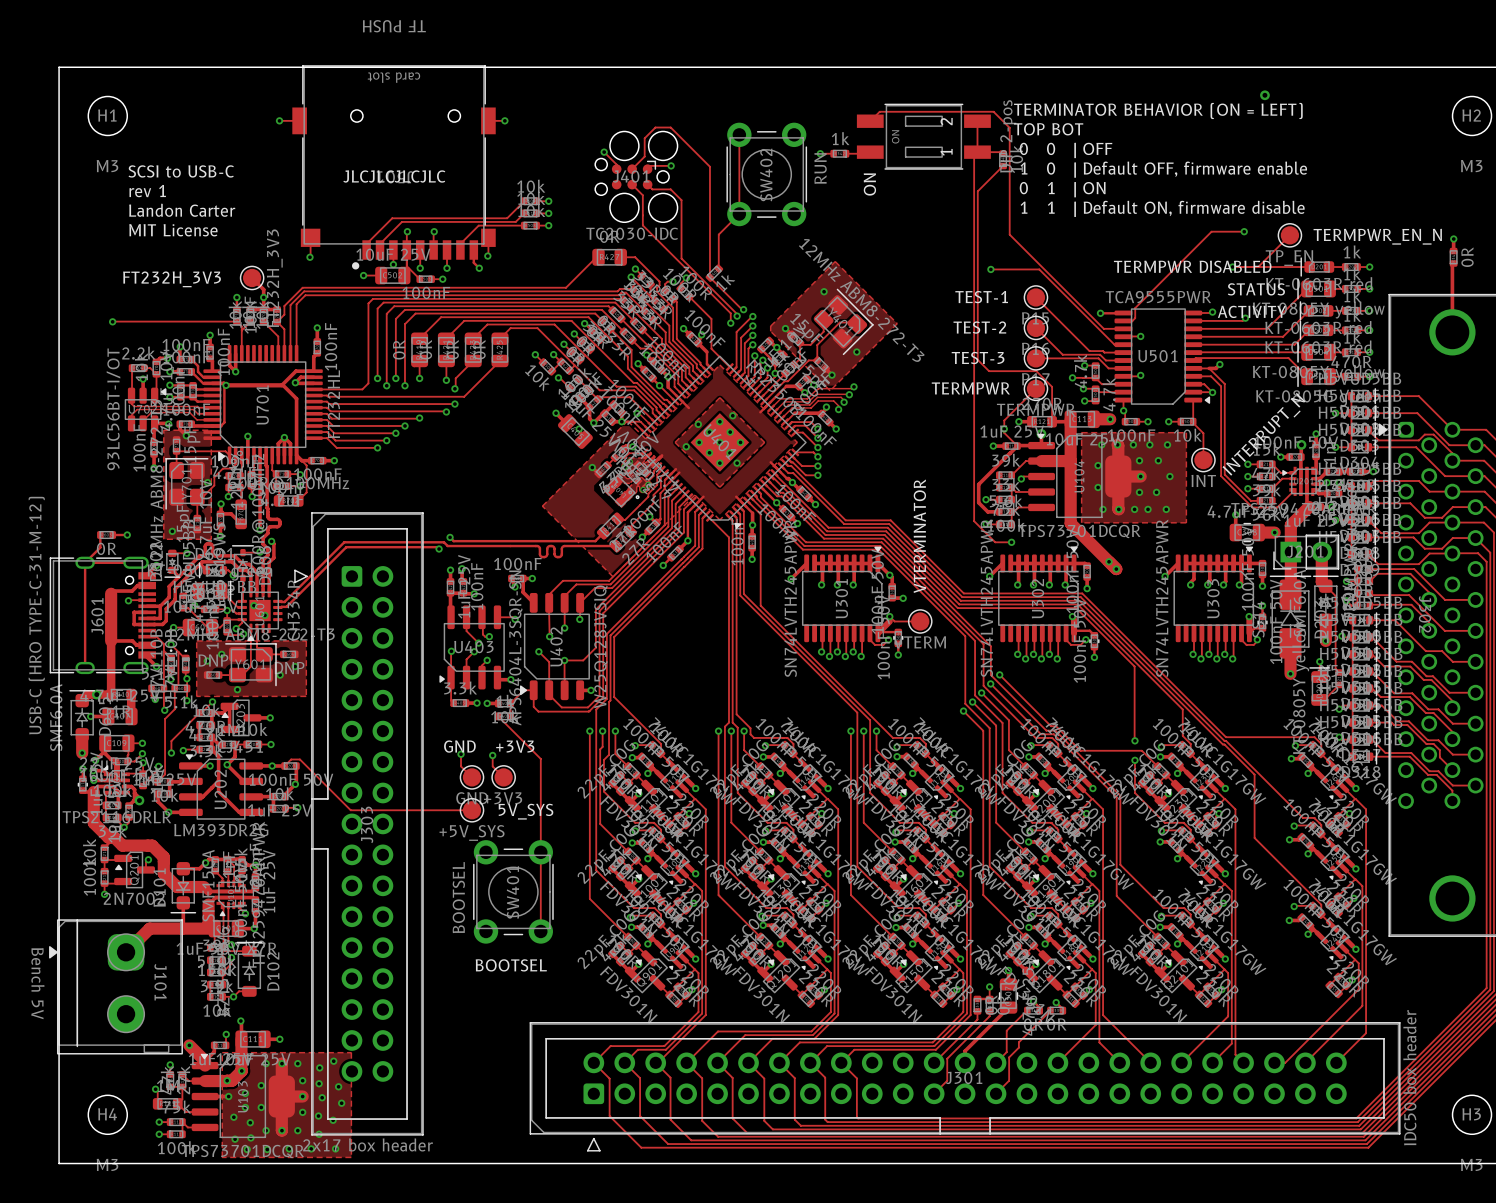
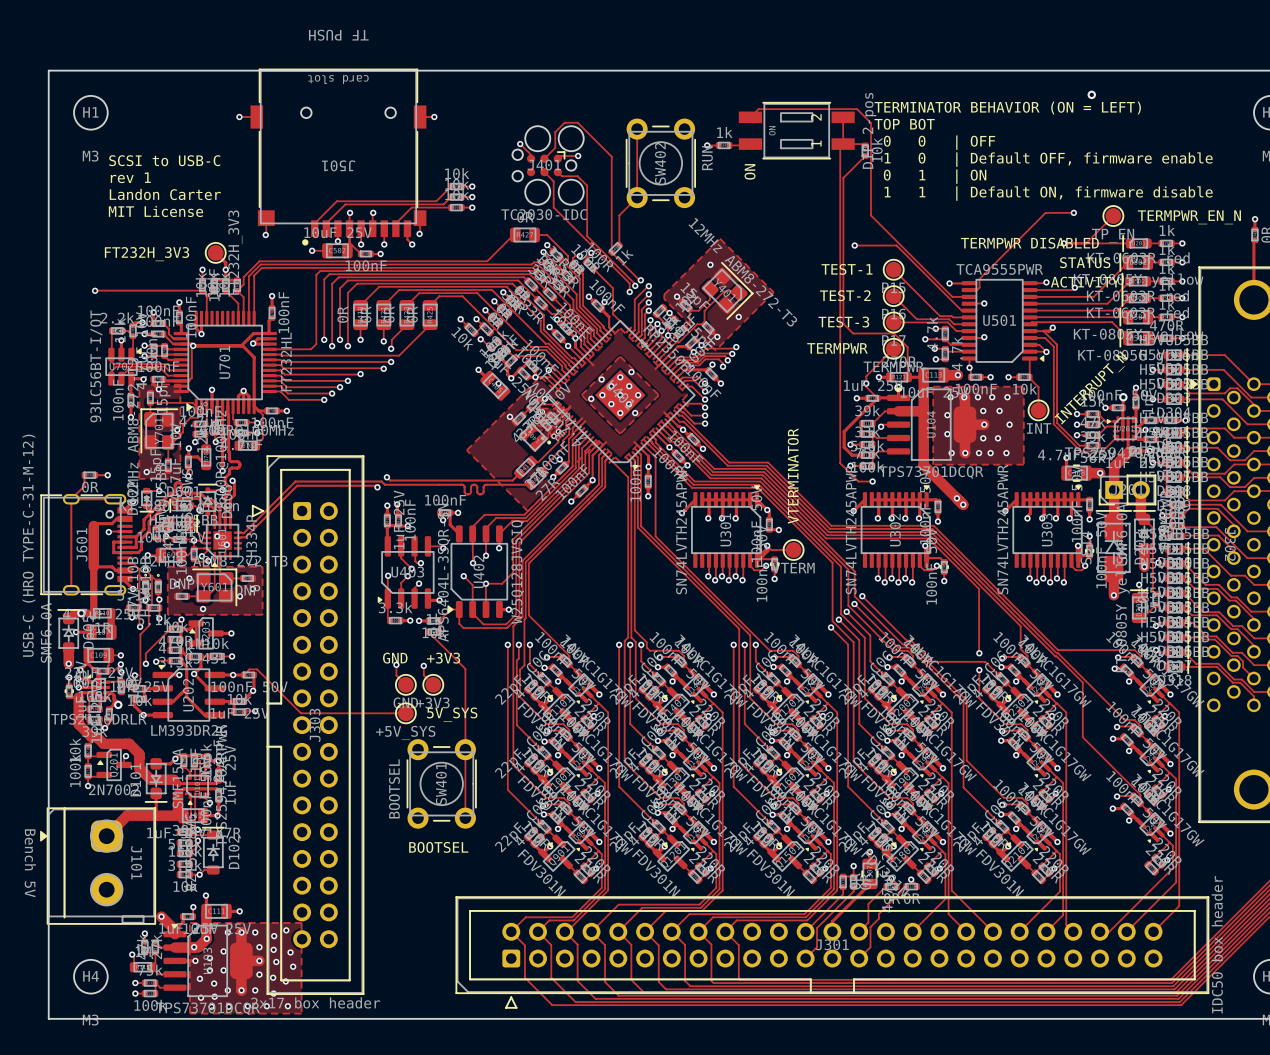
text: JLCJLCJLCJLC (394, 176) -> none

